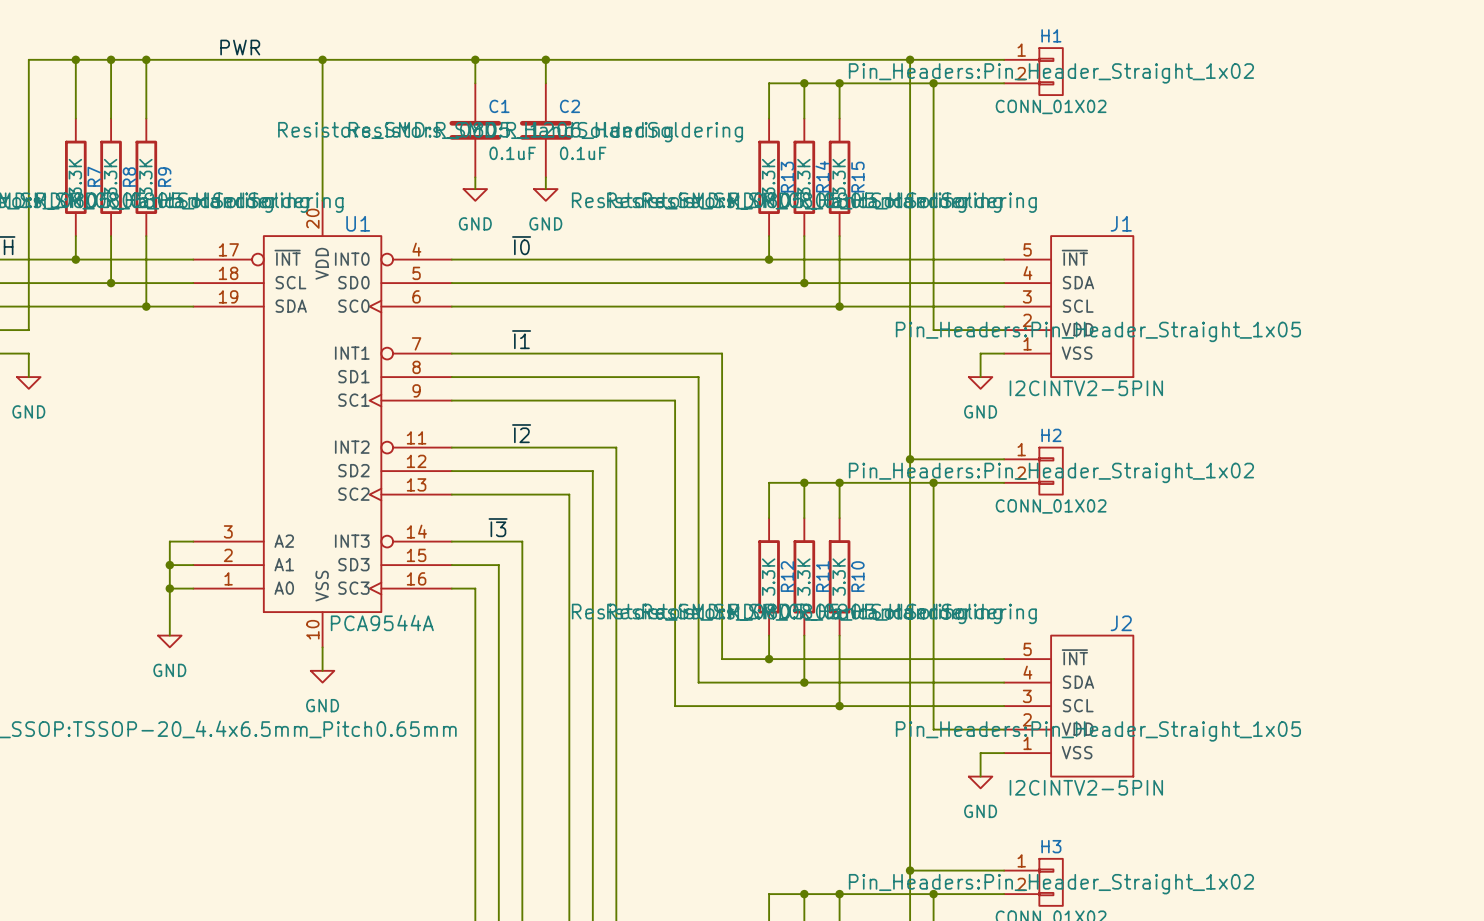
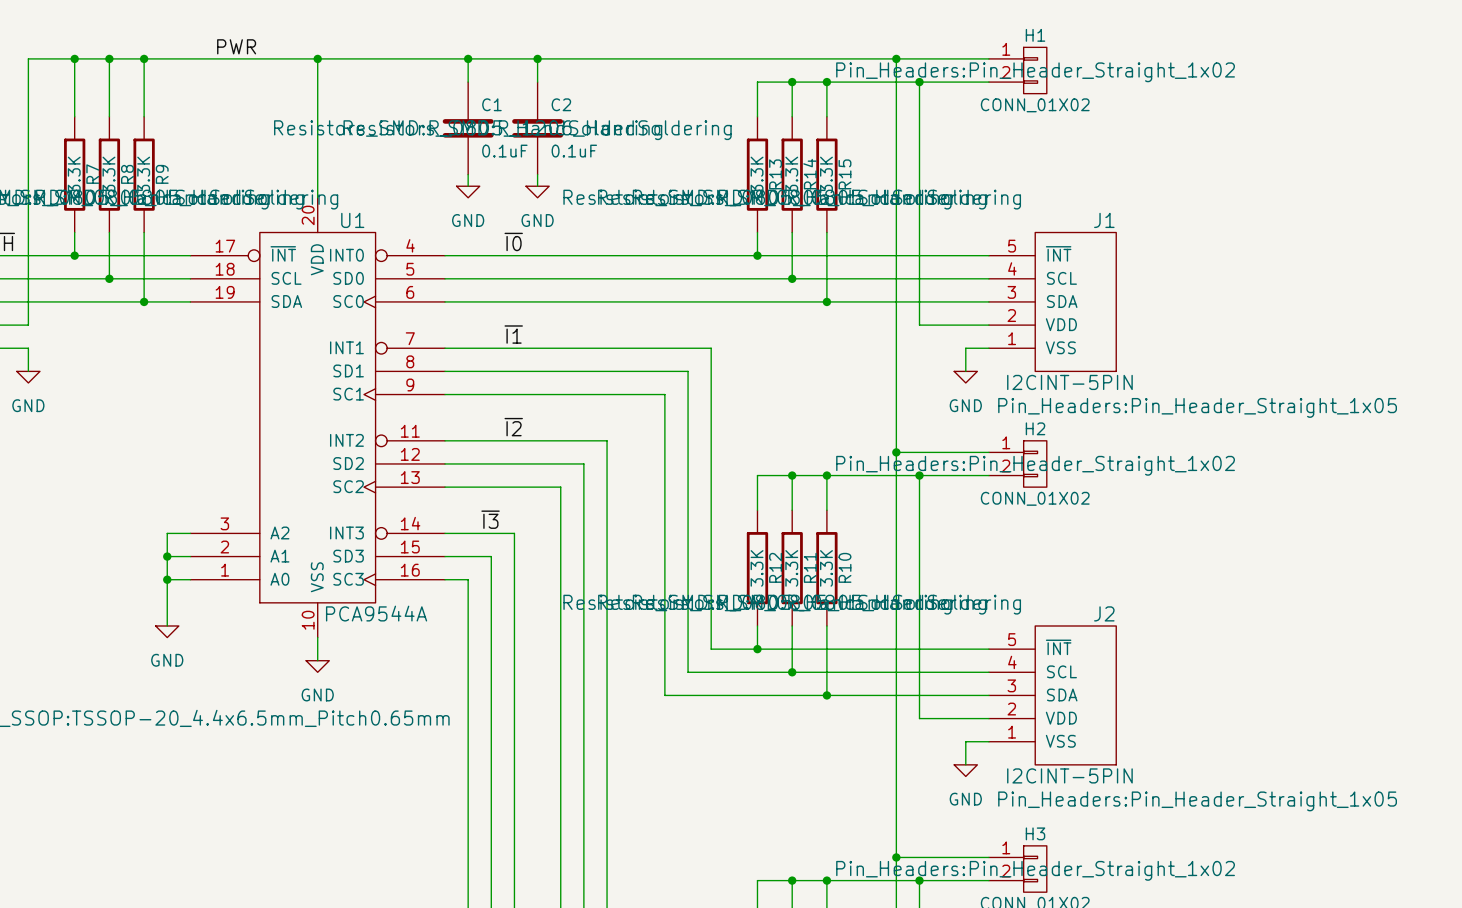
J1 pin name: SDA (1078, 282) -> SCL (1061, 278)
J1 pin name: SCL (1078, 306) -> SDA (1062, 301)
J1 text position: Pin_Headers:Pin_Header_Straight_1x05 (1098, 331) -> Pin_Headers:Pin_Header_Straight_1x05 (1197, 407)
J1 value: I2CINTV2-5PIN (1086, 388) -> I2CINT-5PIN (1069, 382)
J2 pin name: SDA (1078, 682) -> SCL (1061, 671)
J2 pin name: SCL (1078, 705) -> SDA (1062, 695)
J2 text position: Pin_Headers:Pin_Header_Straight_1x05 (1098, 731) -> Pin_Headers:Pin_Header_Straight_1x05 (1197, 801)
J2 value: I2CINTV2-5PIN (1086, 787) -> I2CINT-5PIN (1069, 775)

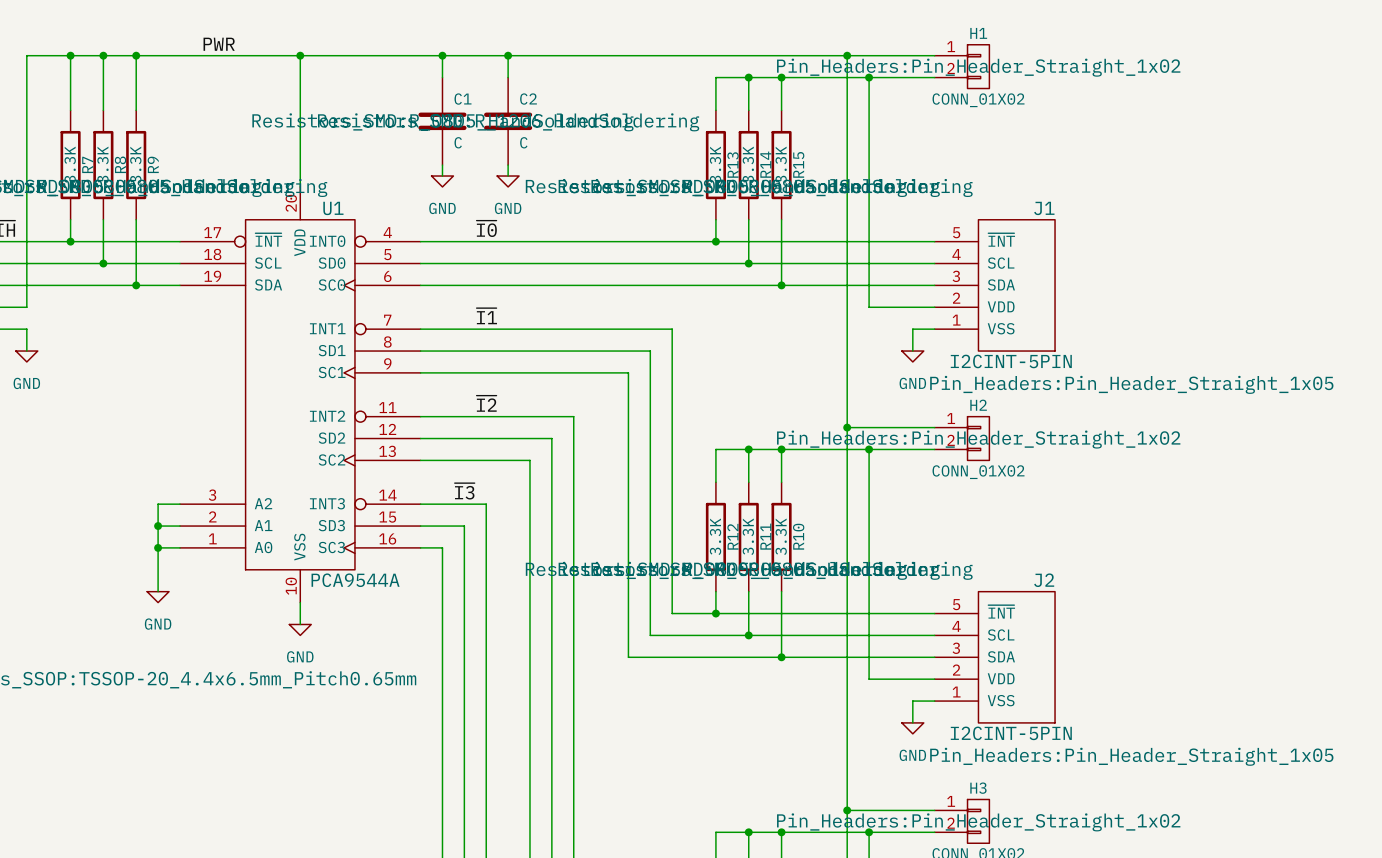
C1 value: 0.1uF (504, 151) -> C (458, 142)
C2 value: 0.1uF (574, 151) -> C (523, 142)

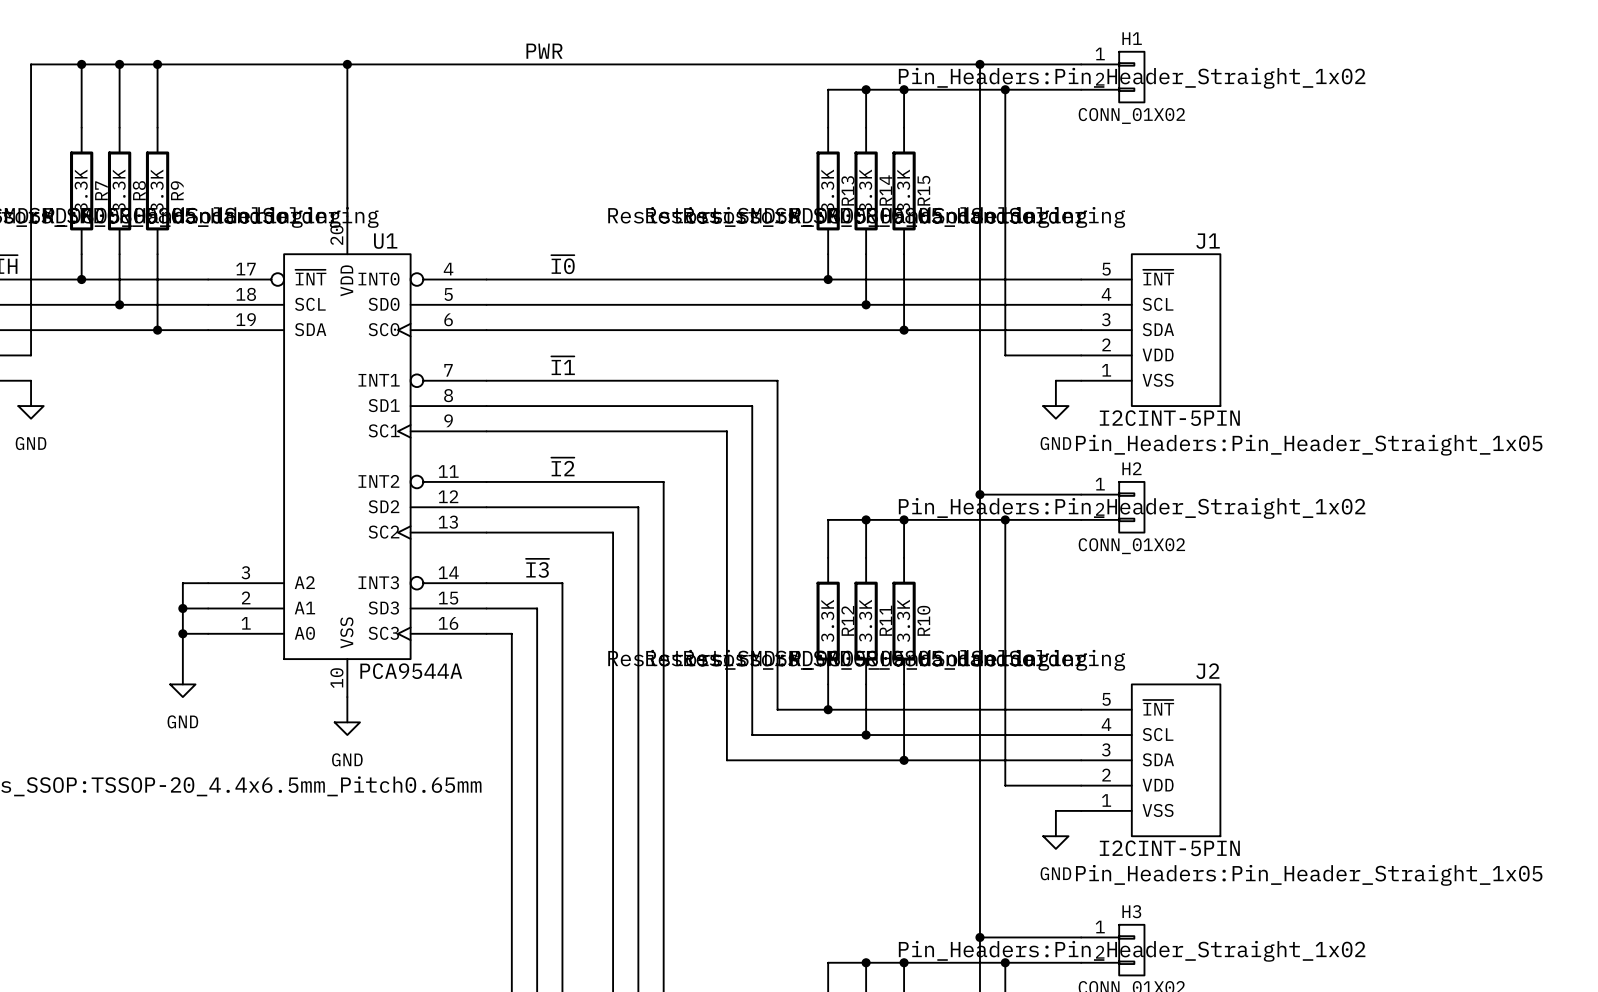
label: PWR (219, 44) -> none
label: none -> PWR (544, 51)
wire: (442, 55) (442, 77) -> none
junction: (442, 55) -> none
wire: (508, 55) (508, 77) -> none
junction: (508, 55) -> none
C1: C (442, 121) -> none
C2: C (508, 121) -> none
wire: (442, 165) (442, 176) -> none
wire: (508, 165) (508, 176) -> none
power symbol: GND (442, 181) -> none
power symbol: GND (508, 181) -> none

